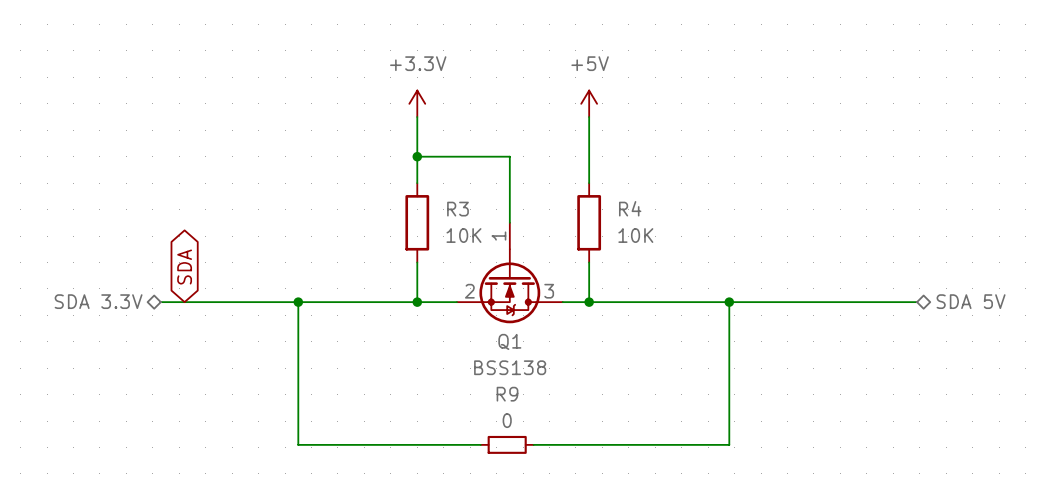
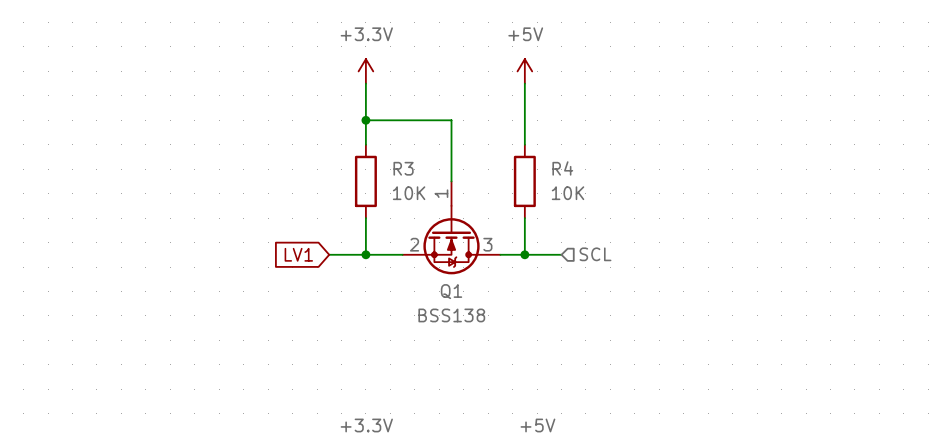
global label: SDA (184, 267) -> none
hierarchical label: SDA 3.3V (98, 301) -> none
hierarchical label: none -> SCL (595, 254)
hierarchical label: SDA 5V (971, 301) -> none
wire: (160, 302) (377, 302) -> none
wire: (298, 302) (298, 444) (480, 444) -> none
junction: (298, 302) -> none
global label: none -> LV1 (298, 254)
wire: (628, 302) (917, 302) -> none
wire: (729, 302) (729, 444) (533, 444) -> none
junction: (729, 302) -> none
R9: 0 (507, 444) -> none

